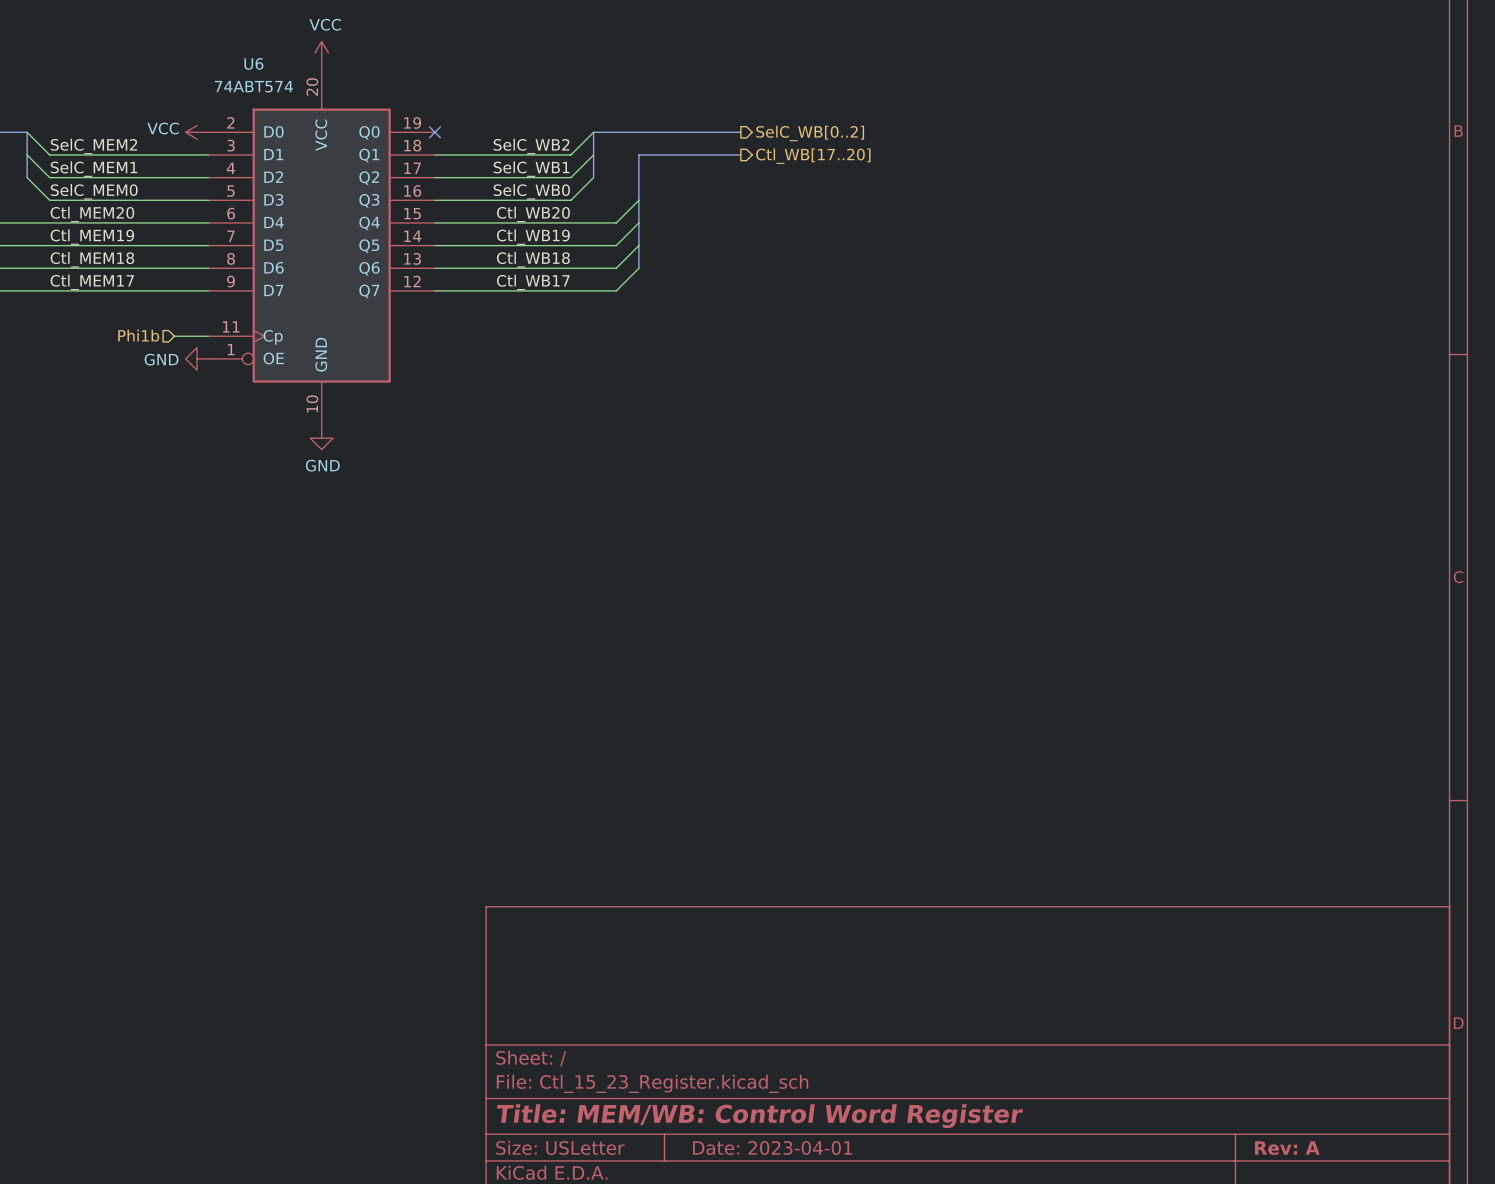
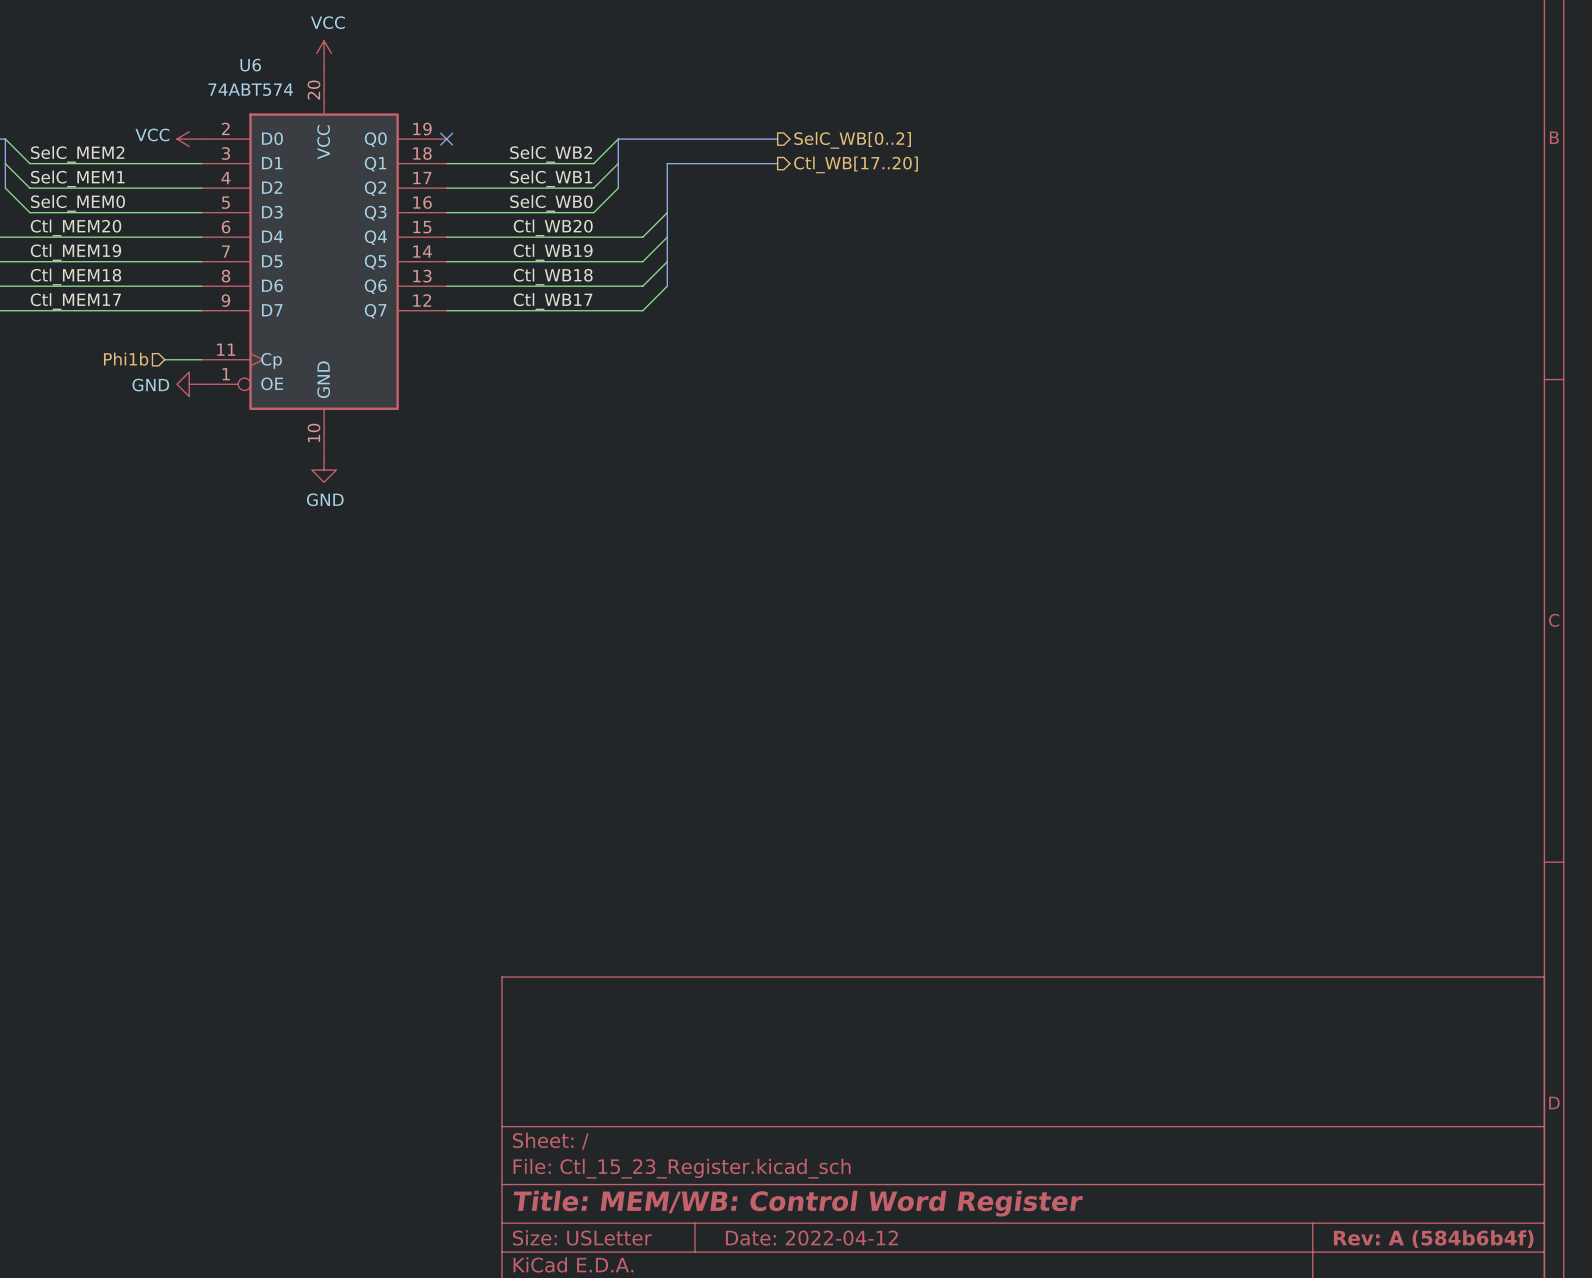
title block: Date: 2023-04-01 (772, 1147) -> Date: 2022-04-12 (811, 1238)
title block: Rev: A (1287, 1148) -> Rev: A (584b6b4f) (1433, 1239)

